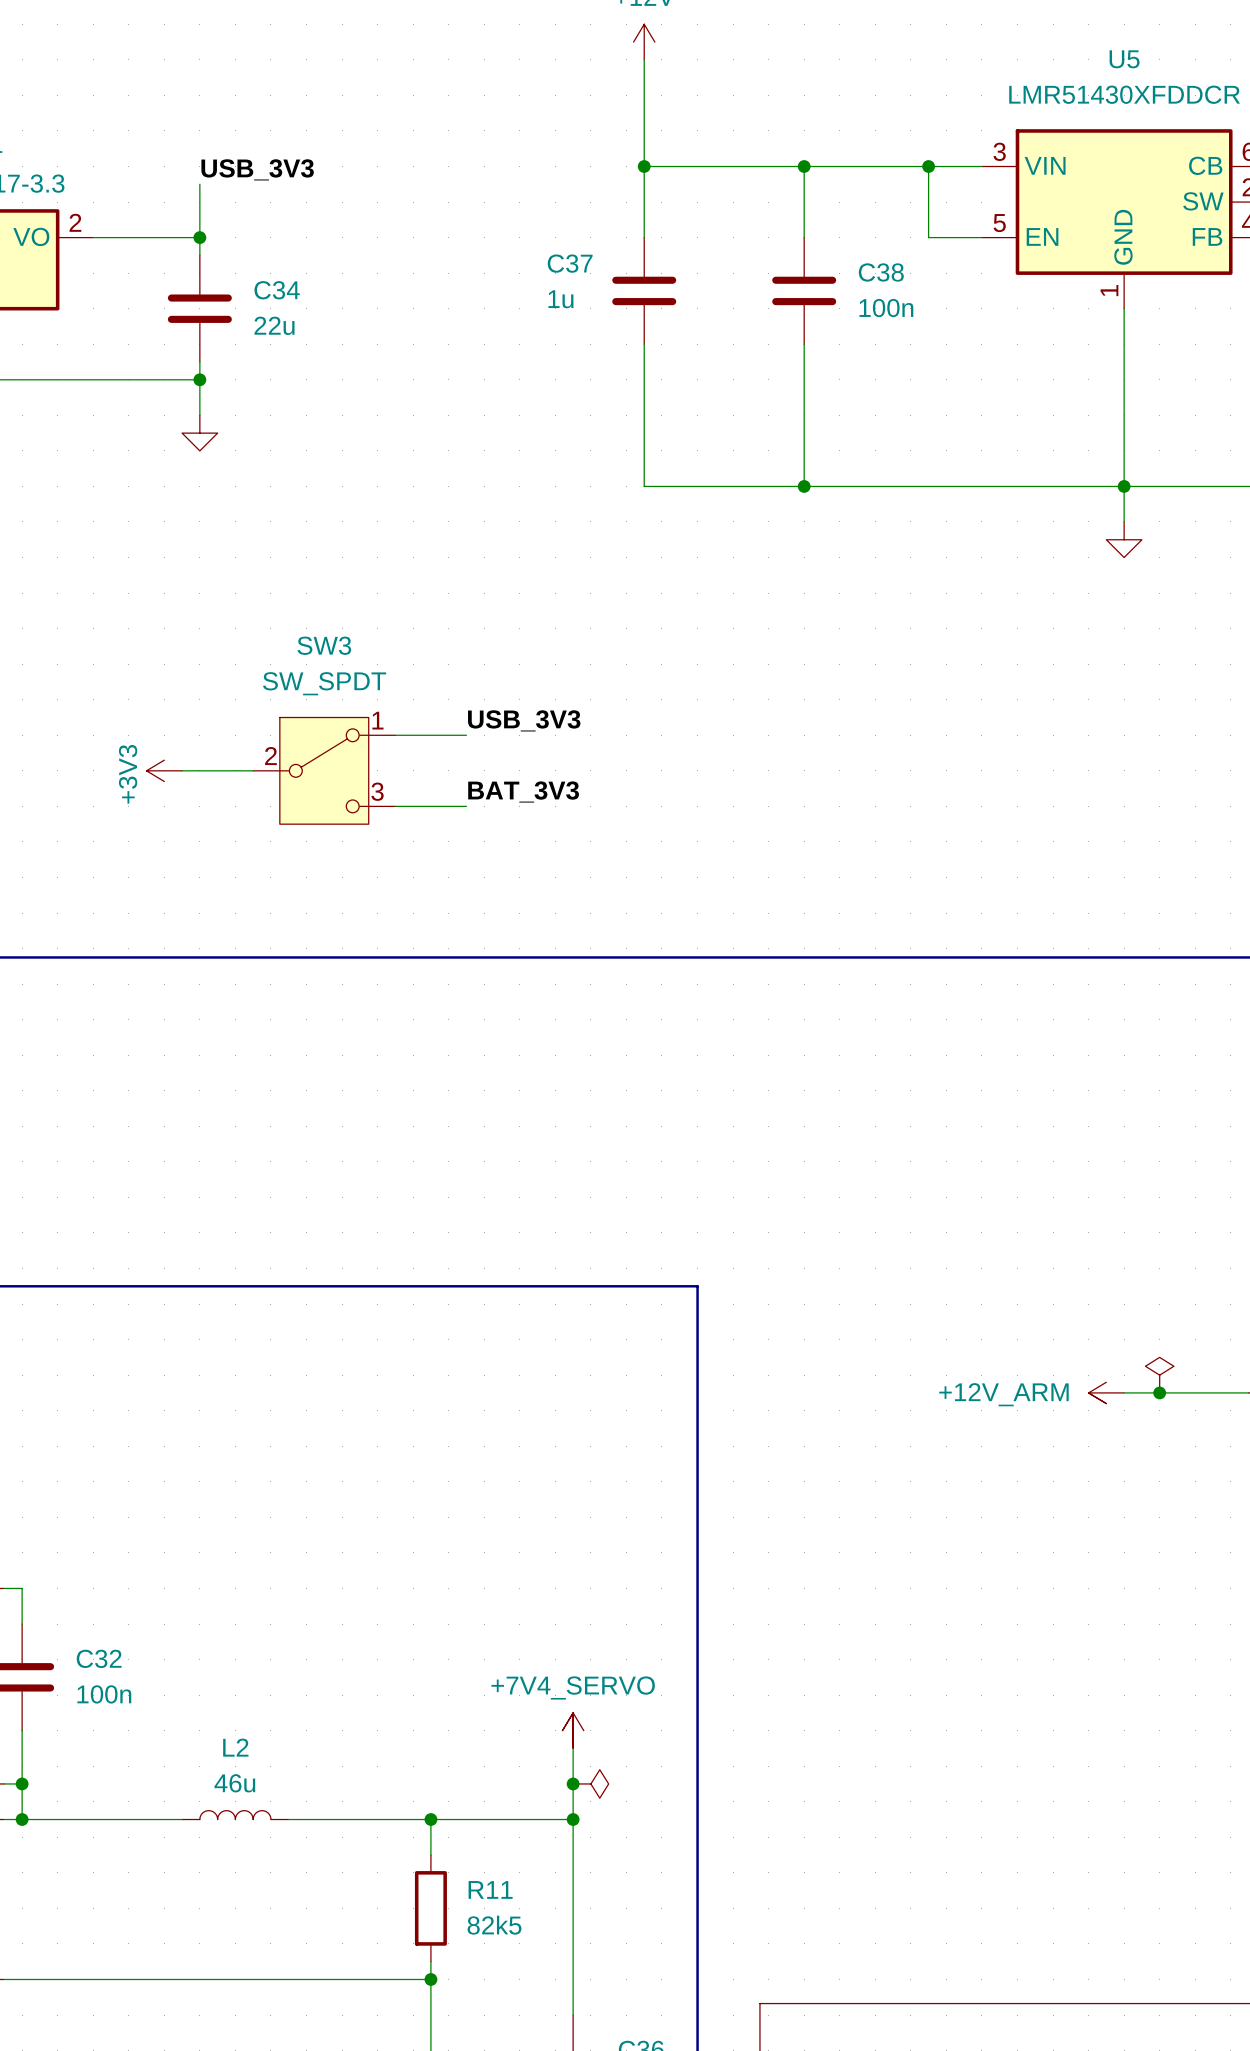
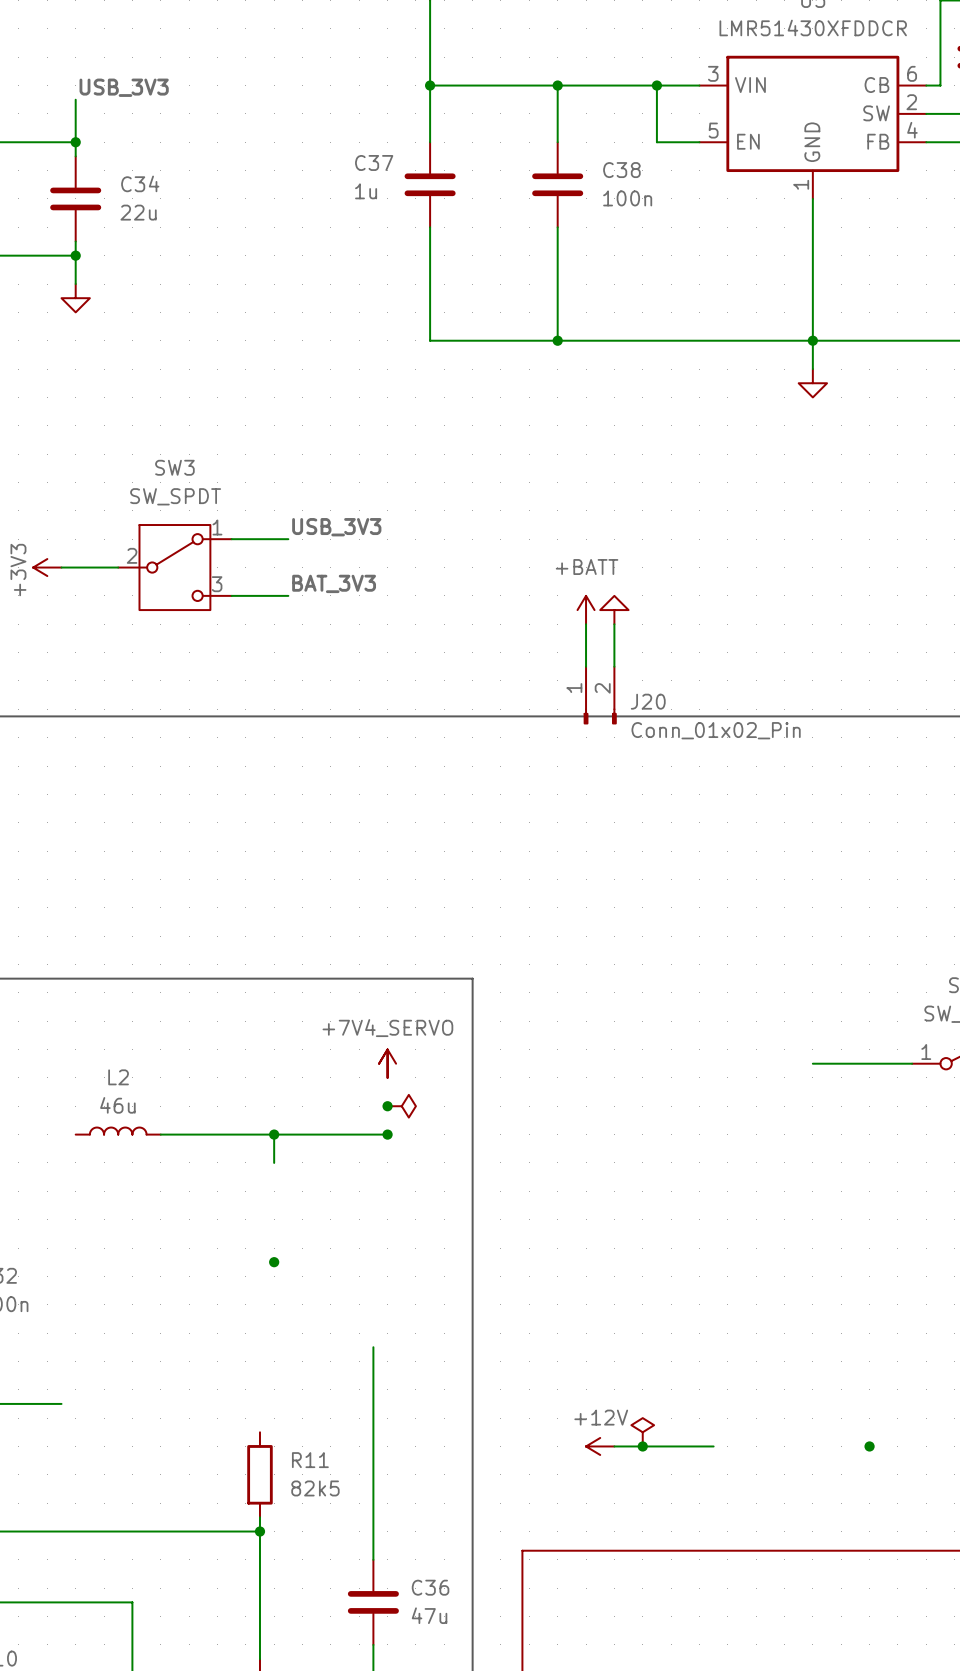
power symbol: none -> +BATT (586, 610)
power symbol: none -> (614, 610)
wire: none -> (586, 624) (586, 666)
wire: none -> (614, 624) (614, 666)
J20: none -> Conn_01x02_Pin (600, 695)
power symbol: (1159, 1375) -> none
power symbol: +12V_ARM (1106, 1392) -> none
junction: (1159, 1392) -> none
junction: none -> (387, 1106)
power symbol: none -> (401, 1106)
junction: none -> (274, 1134)
junction: none -> (387, 1134)
junction: none -> (274, 1262)
power symbol position: +7V4_SERVO (573, 1730) -> +7V4_SERVO (387, 1063)
junction: (573, 1783) -> none
power symbol: (590, 1783) -> none
L2 position: (235, 1815) -> (118, 1131)
wire: (288, 1819) (573, 1819) -> (160, 1134) (387, 1134)
wire: (430, 1819) (430, 1855) -> (274, 1134) (274, 1162)
junction: (430, 1819) -> none
junction: (573, 1819) -> none
power symbol: none -> (642, 1432)
power symbol: none -> +12V (600, 1446)
wire: none -> (614, 1446) (713, 1446)
junction: none -> (642, 1446)
junction: none -> (869, 1446)

